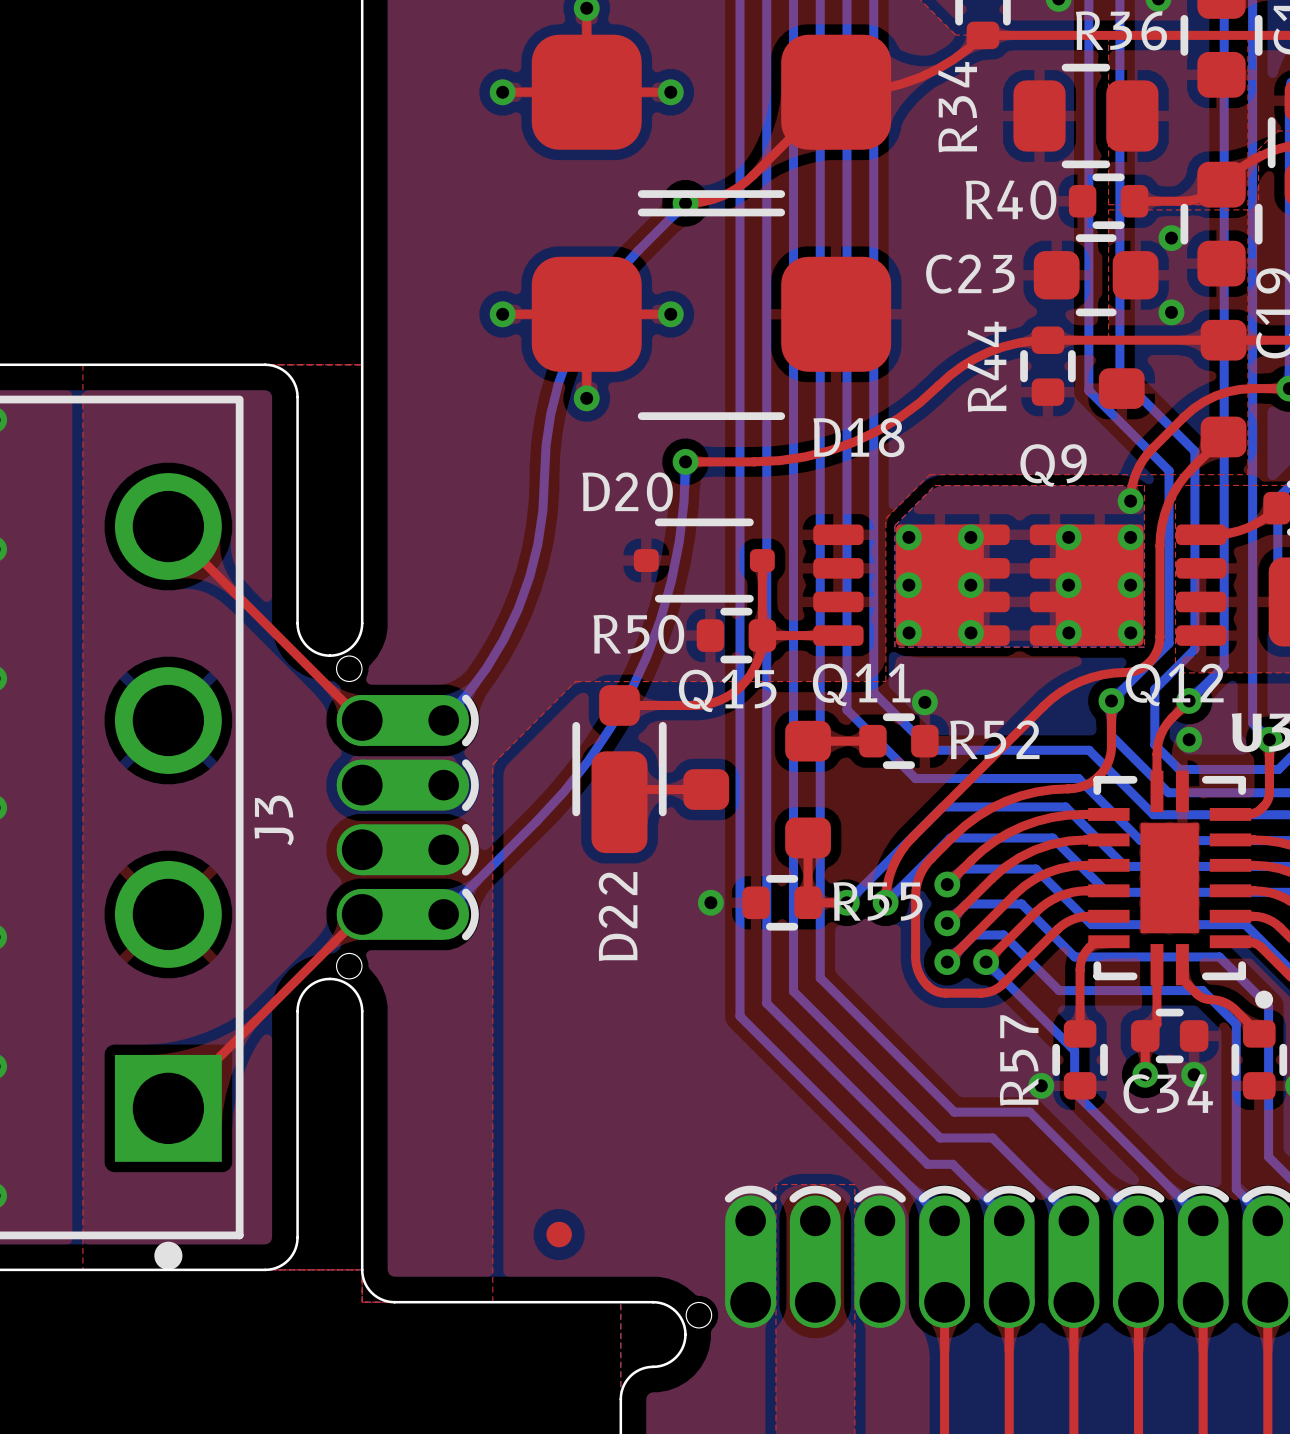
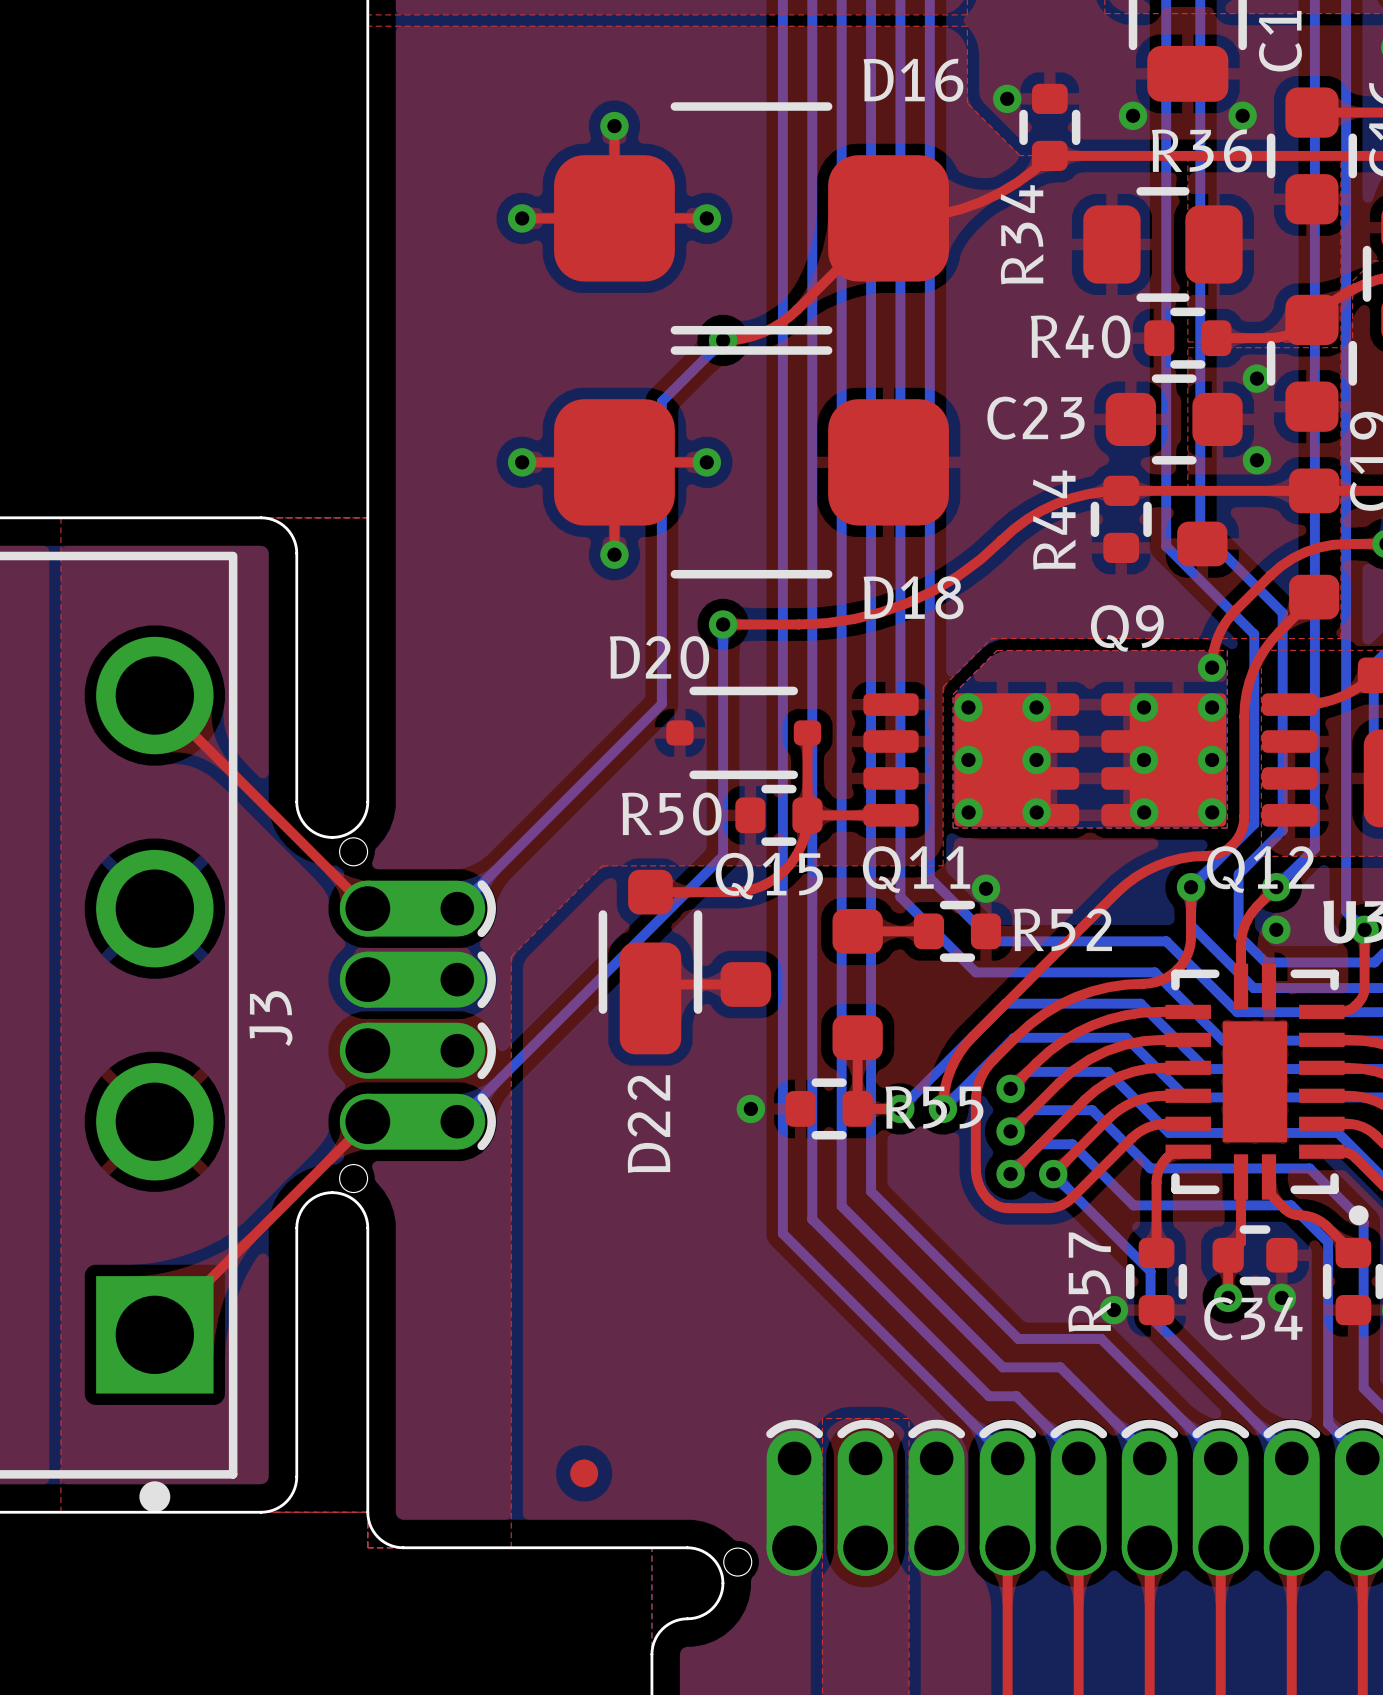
bottom track: (638, 250) (617, 273) (598, 299) (582, 326) (568, 354) (558, 384) (550, 414) (546, 445) (542, 510) (537, 544) (529, 576) (518, 608) (503, 639) (486, 668) (466, 695) (443, 720) -> (671, 392) (661, 401) (661, 704) (457, 908)
bottom track: (685, 461) (684, 501) (679, 541) (671, 580) (660, 619) (646, 656) (630, 692) (610, 727) (588, 760) (563, 792) (536, 821) -> (723, 624) (723, 855) (559, 1019)

